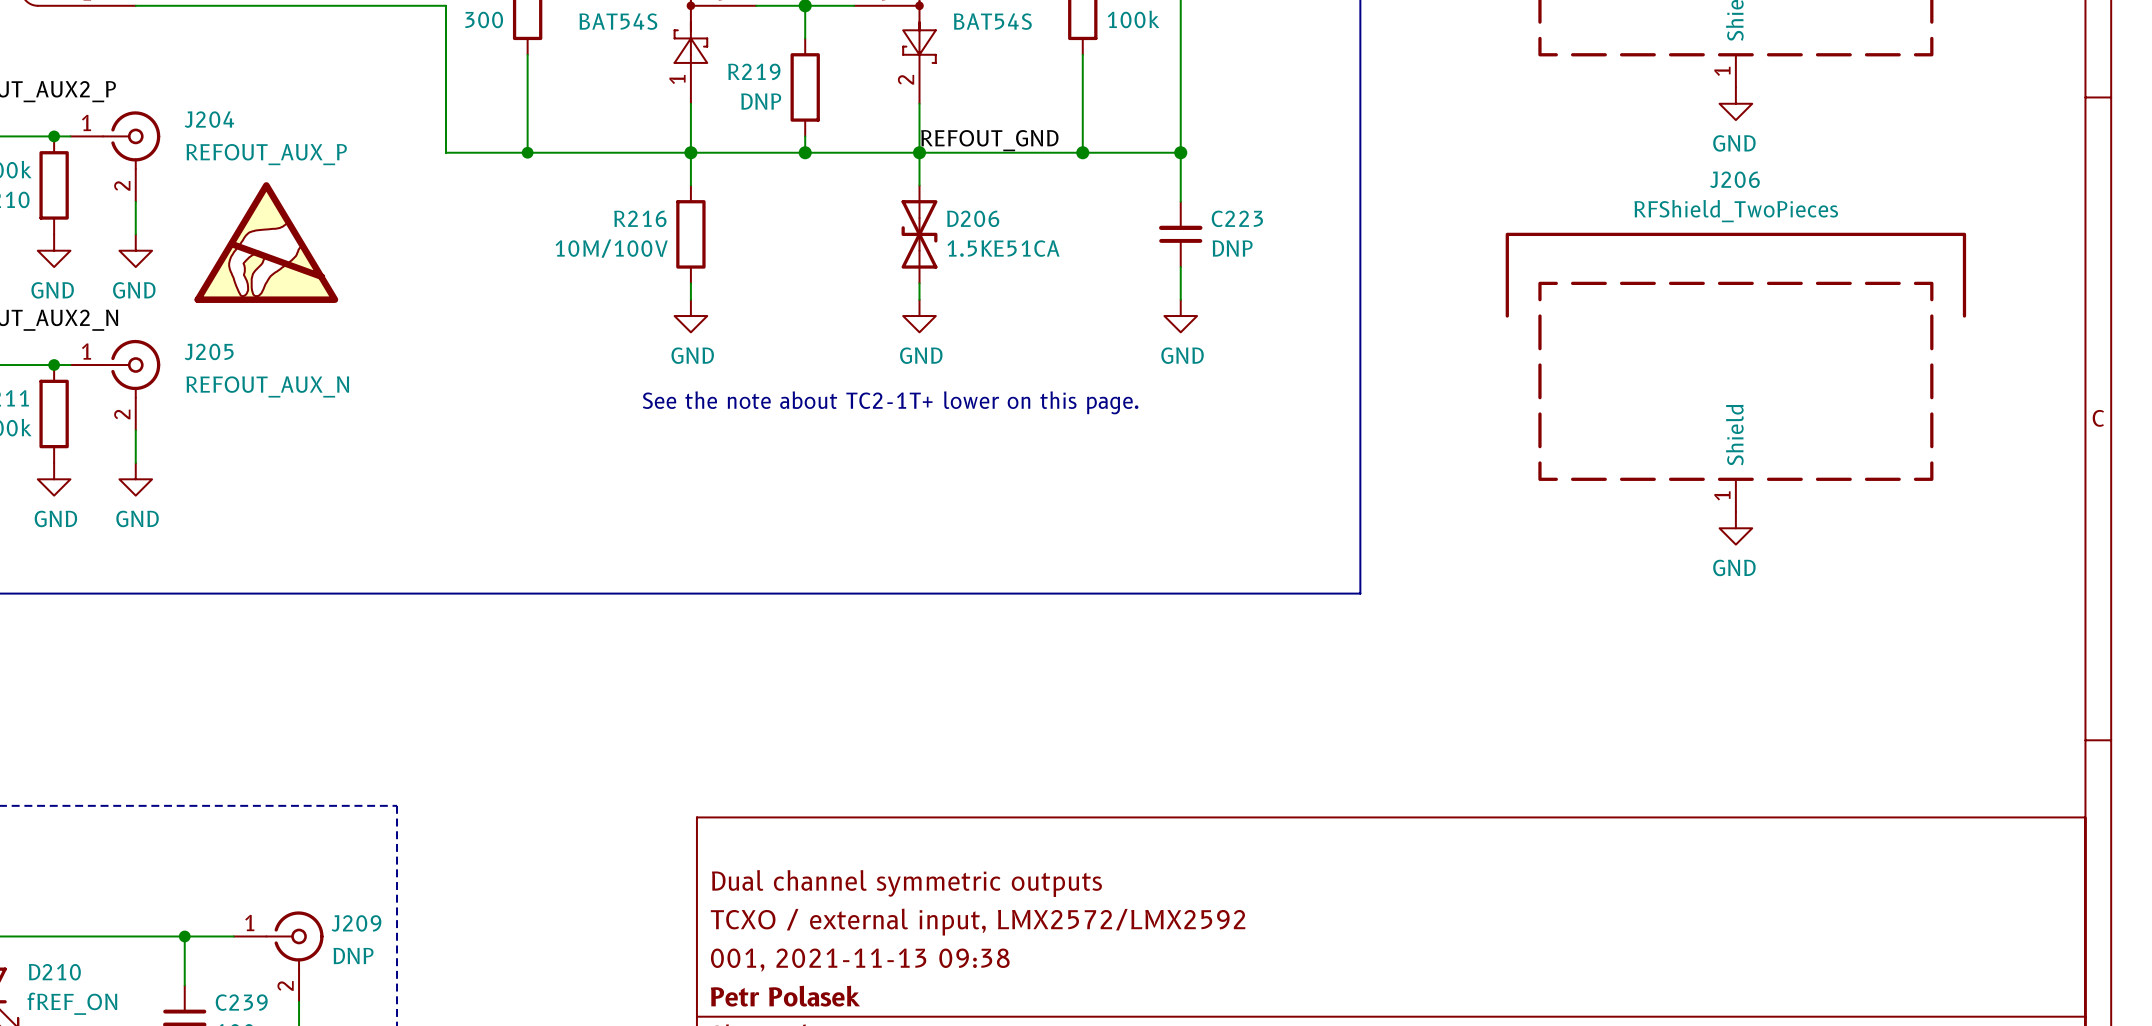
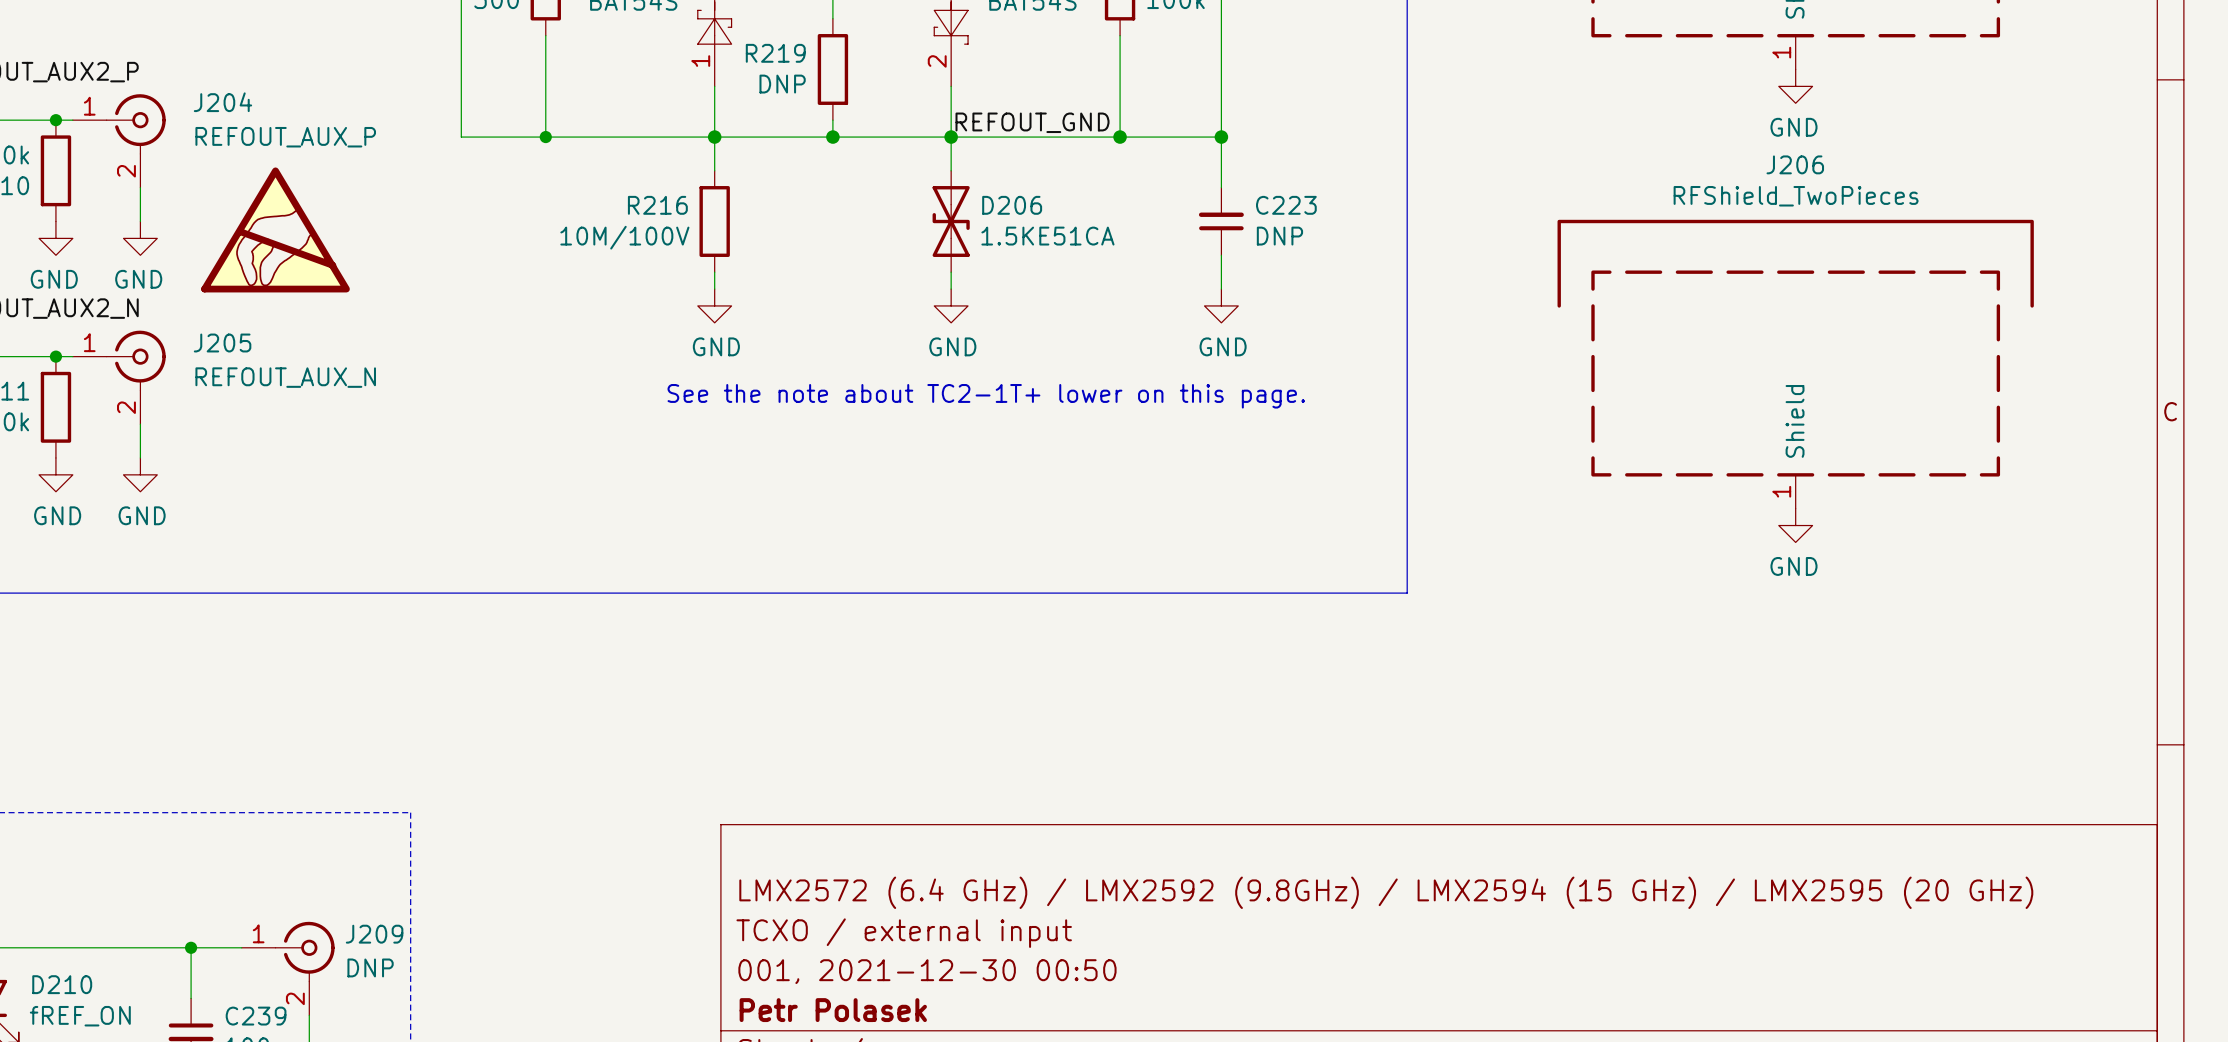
title block: Dual channel symmetric outputs (906, 883) -> LMX2572 (6.4 GHz) / LMX2592 (9.8GHz) / LMX2594 (15 GHz) / LMX2595 (20 GHz) (1386, 892)
title block: TCXO / external input, LMX2572/LMX2592 (978, 922) -> TCXO / external input (904, 933)
title block: 001, 2021-11-13 09:38 (860, 960) -> 001, 2021-12-30 00:50 (927, 971)

